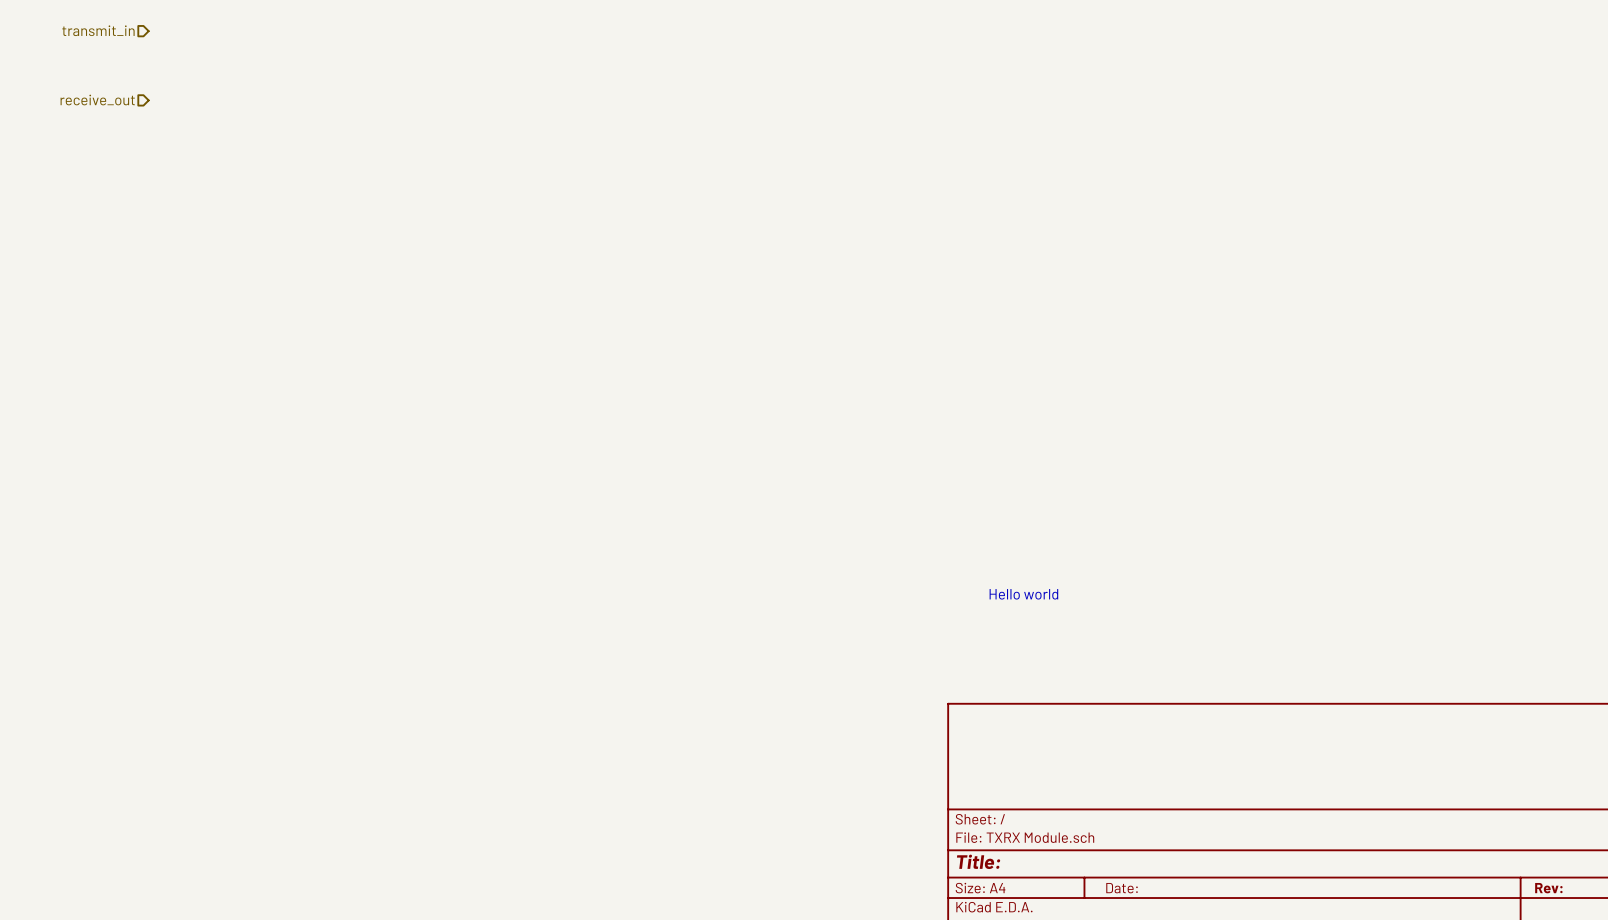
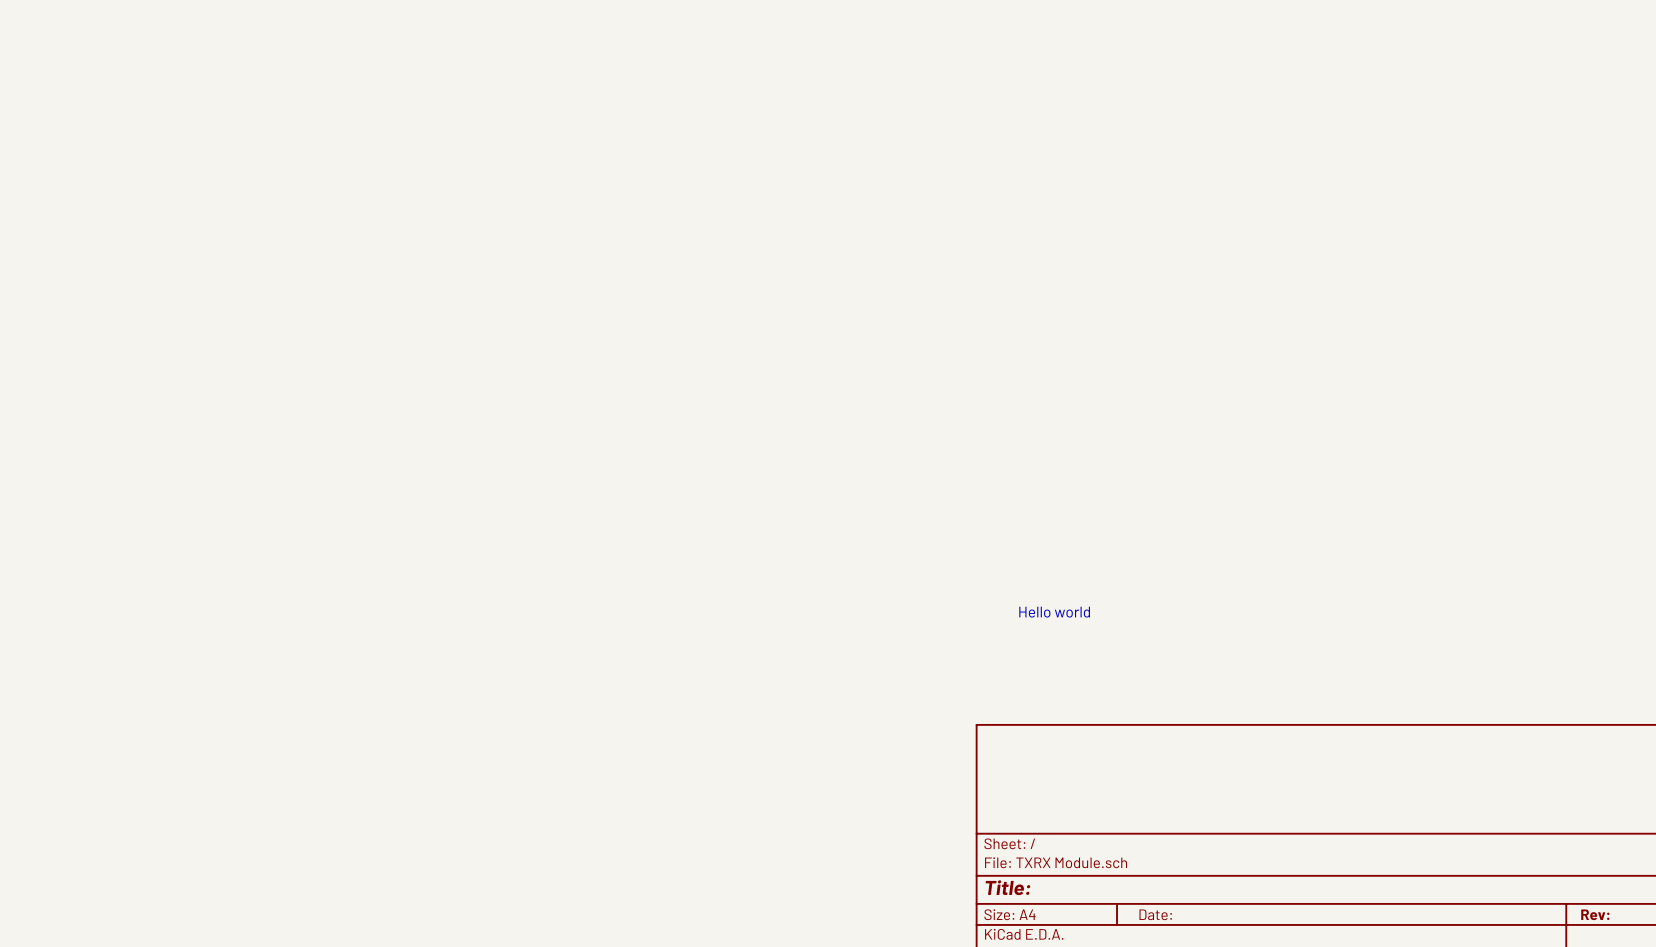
hierarchical label: transmit_in (98, 30) -> none
hierarchical label: receive_out (97, 100) -> none

